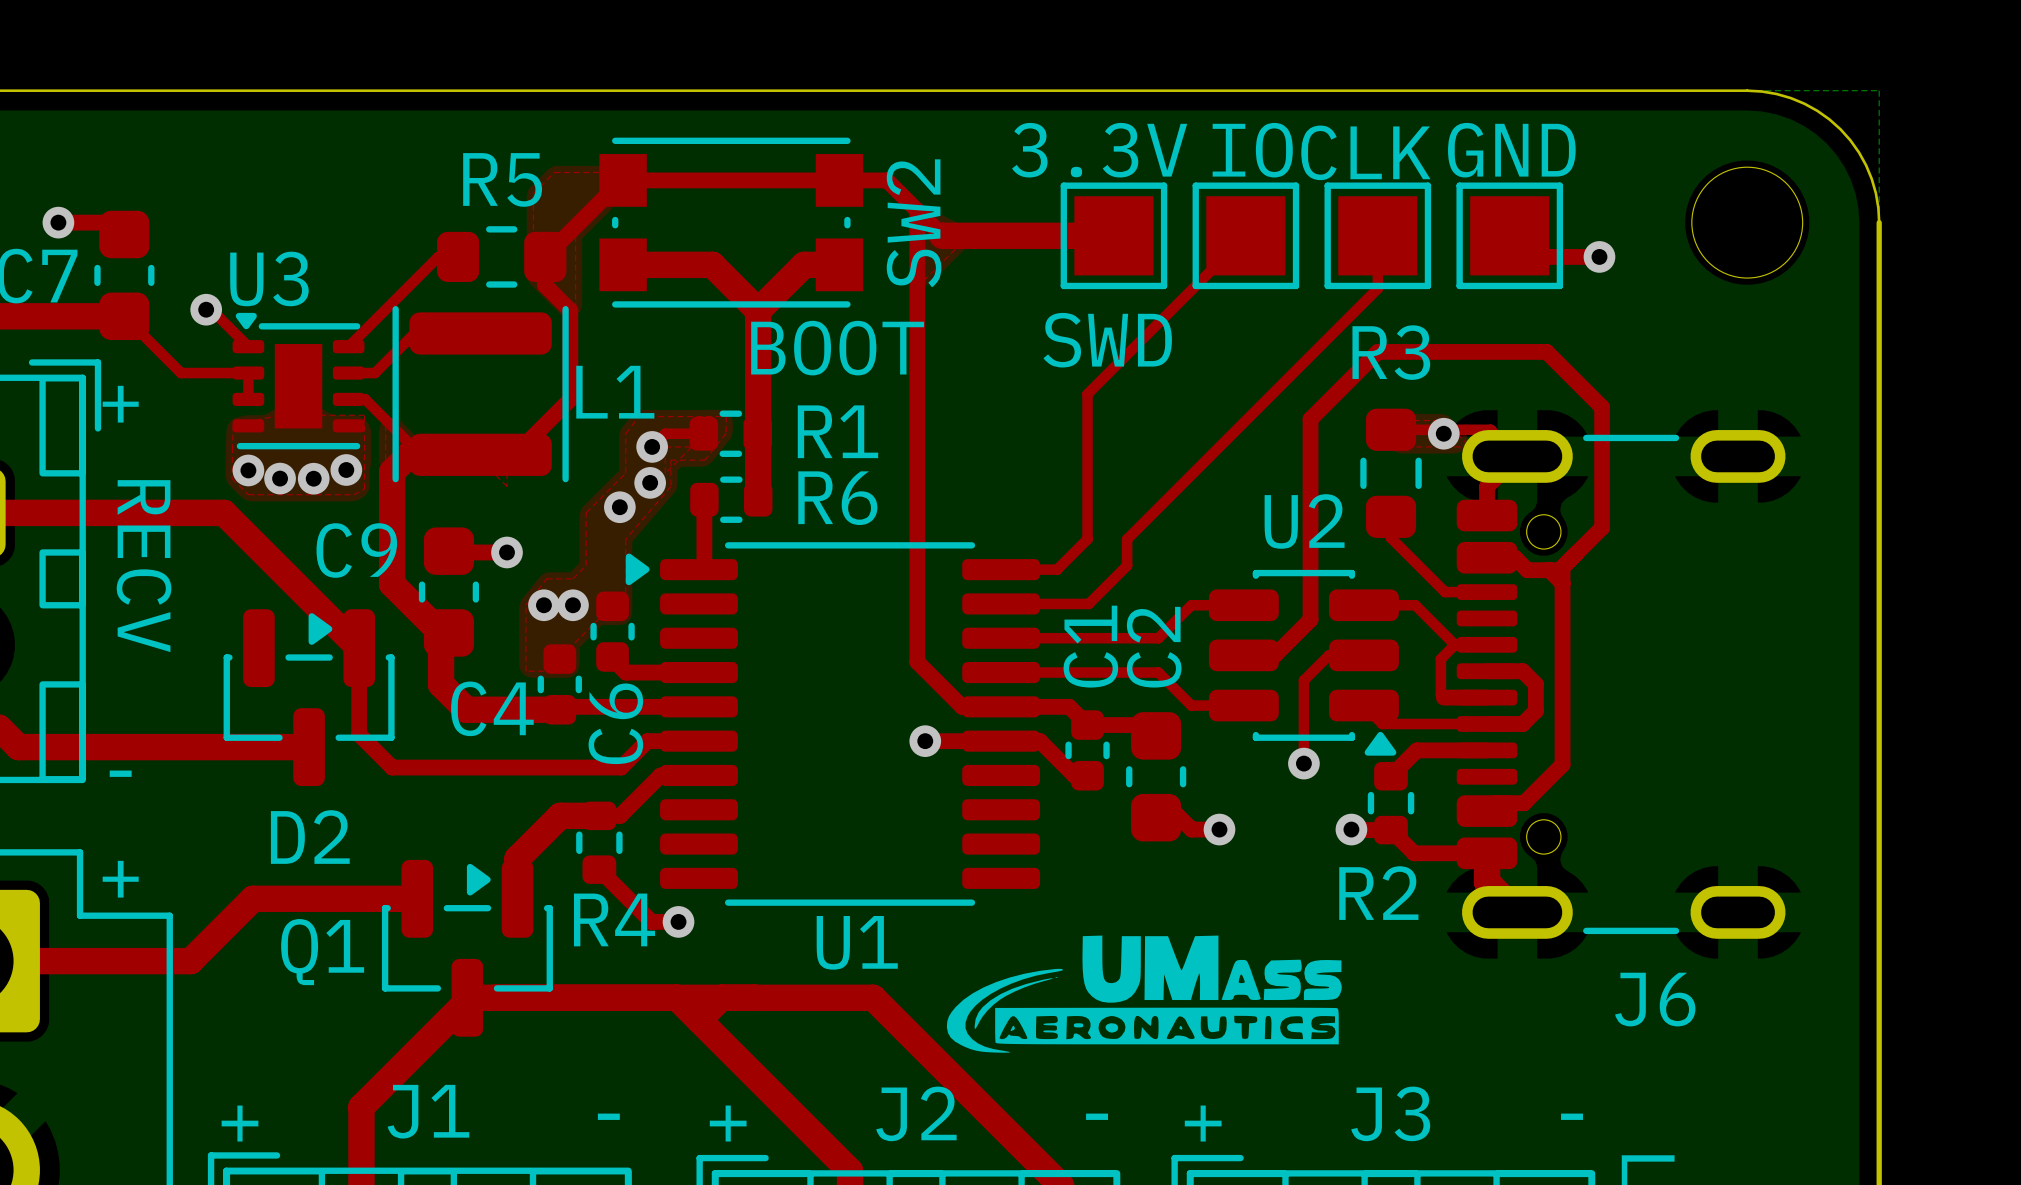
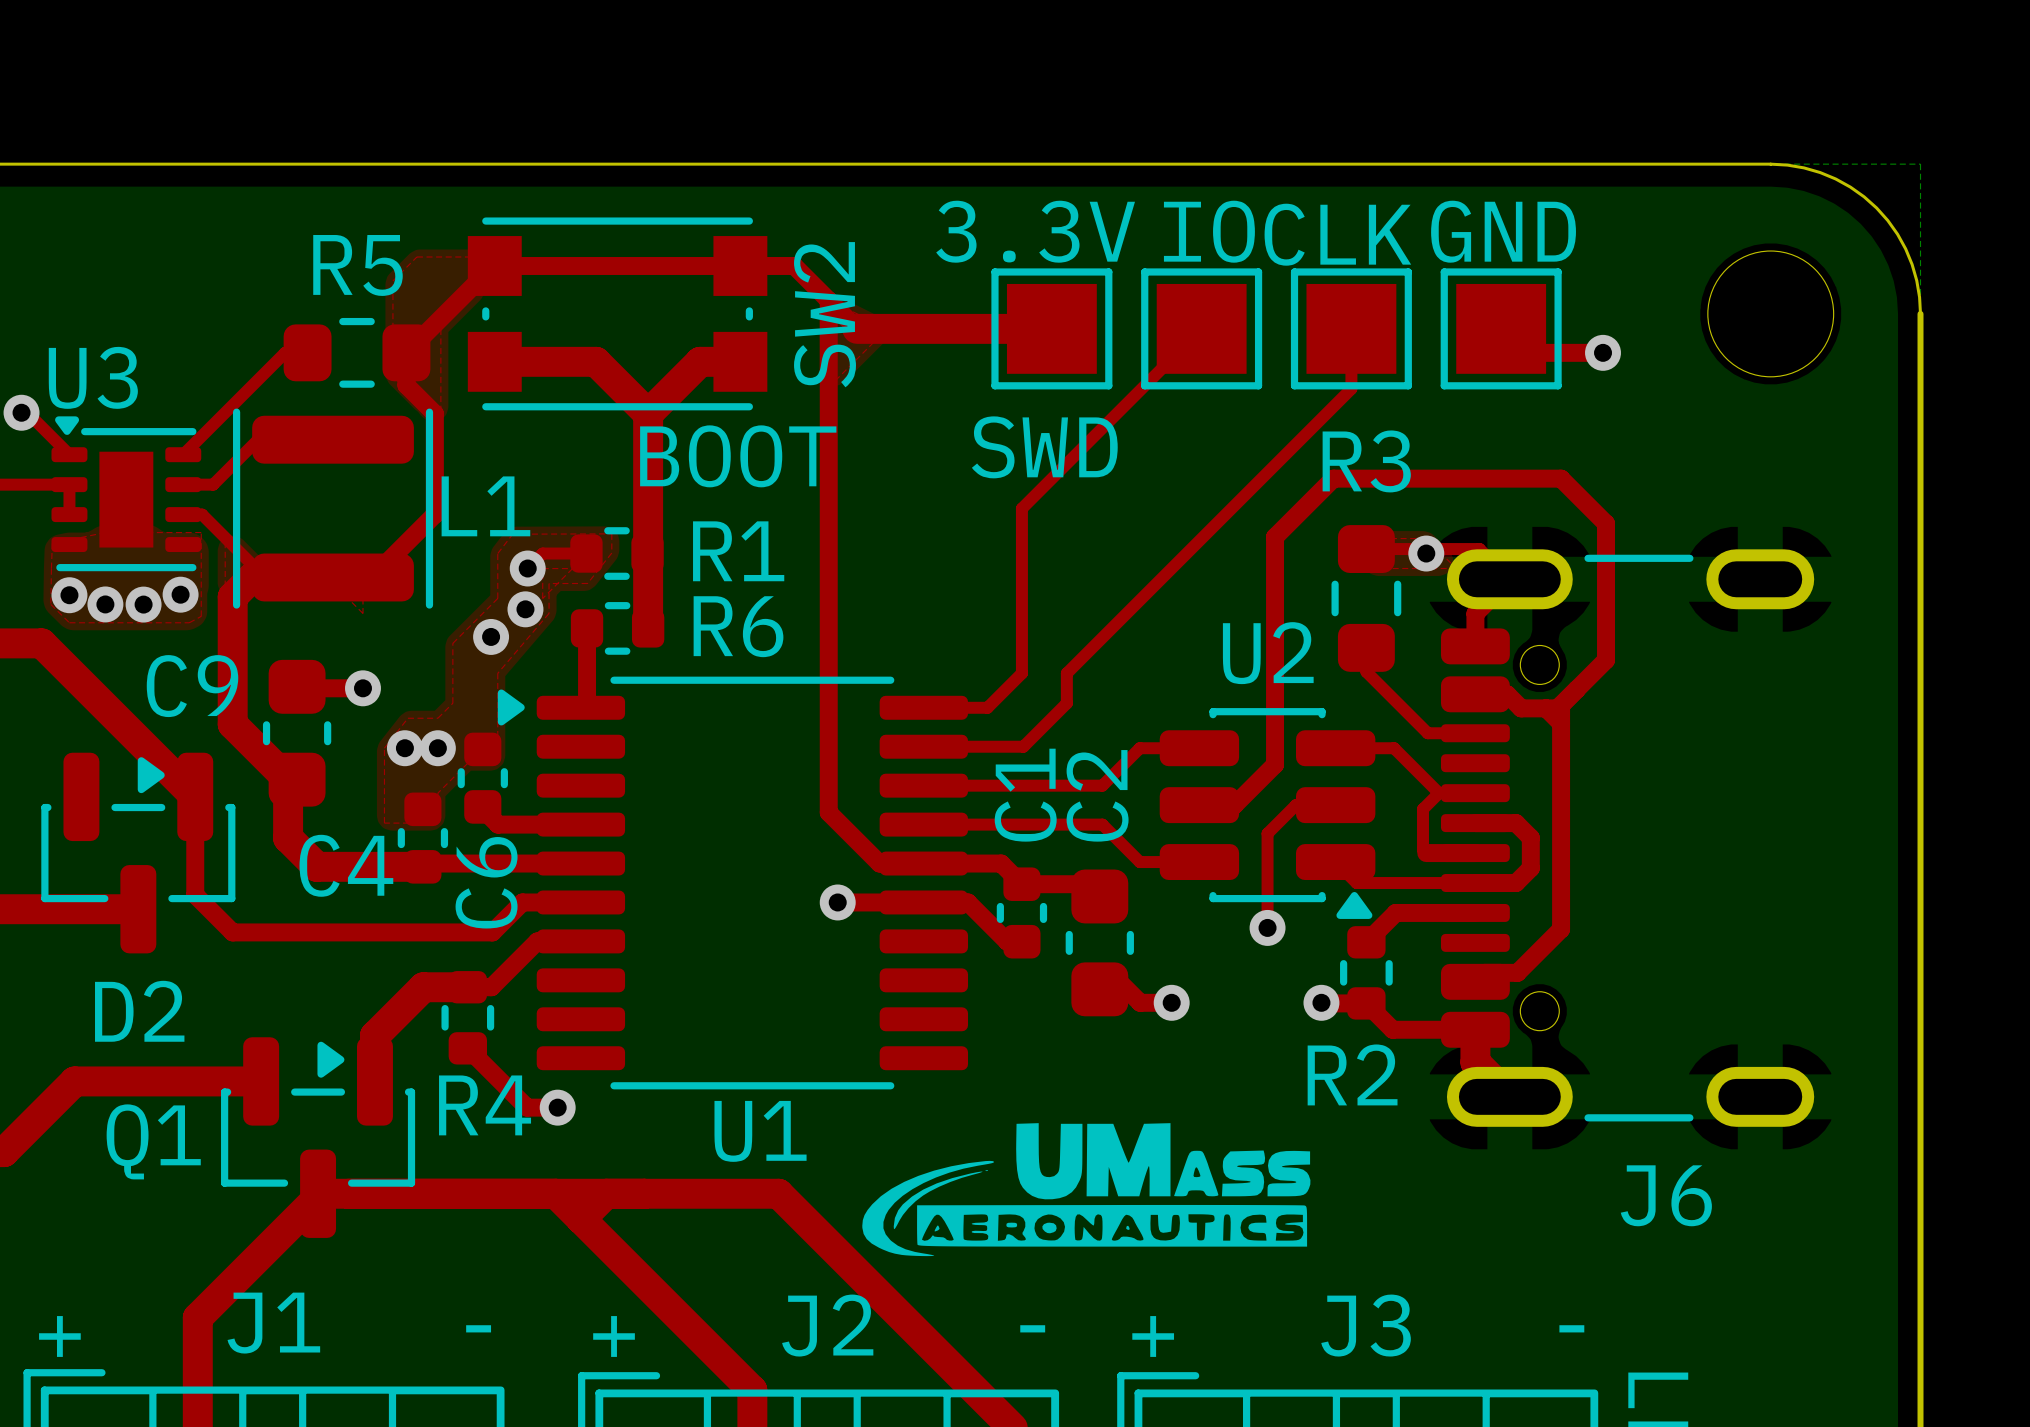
top track: (1361, 367) (1377, 351) (1546, 351) (1562, 367) -> (1333, 478) (1561, 478)

